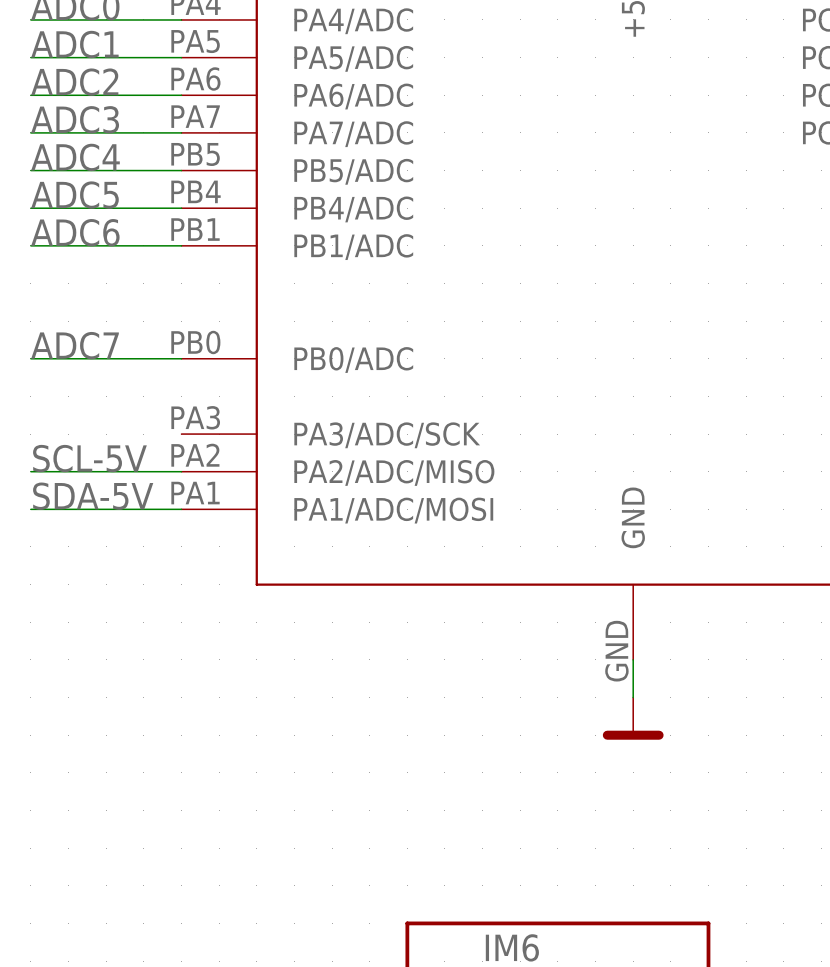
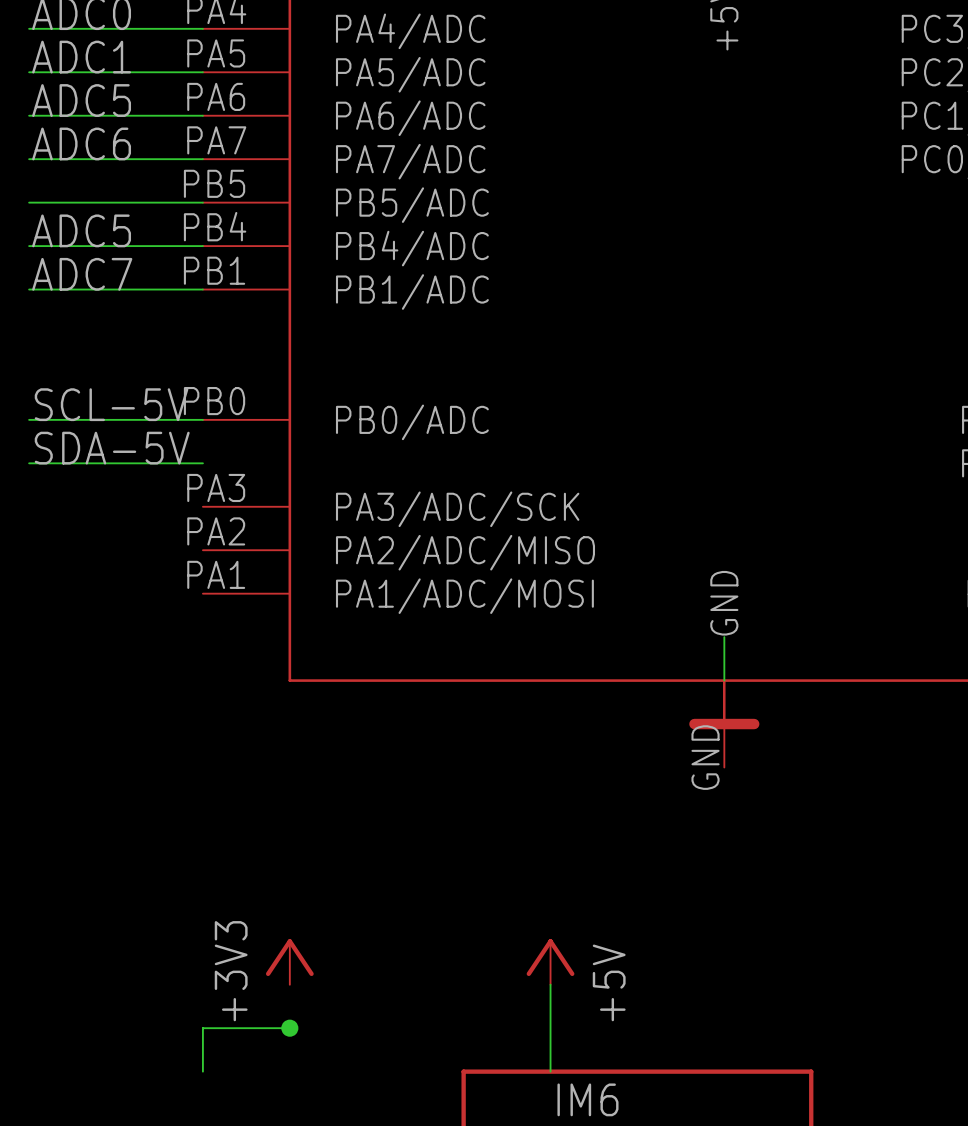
label: ADC2 (74, 82) -> ADC5 (81, 100)
label: ADC3 (75, 119) -> ADC6 (81, 143)
label: ADC4 (75, 157) -> none
label: ADC6 (75, 232) -> ADC7 (82, 274)
label: ADC7 (75, 345) -> SCL-5V (111, 404)
label: SCL-5V (89, 458) -> none
wire: (30, 471) (181, 471) -> none
label position: SDA-5V (93, 496) -> SDA-5V (112, 448)
wire: (30, 509) (181, 509) -> (29, 463) (202, 463)
wire: (633, 659) (633, 697) -> (724, 637) (724, 680)
power symbol position: (633, 718) -> (724, 704)
power symbol: none -> +3V3 (289, 961)
power symbol: none -> +5V (550, 961)
wire: none -> (550, 984) (550, 1071)
wire: none -> (289, 1028) (202, 1028) (202, 1071)
junction: none -> (289, 1028)

